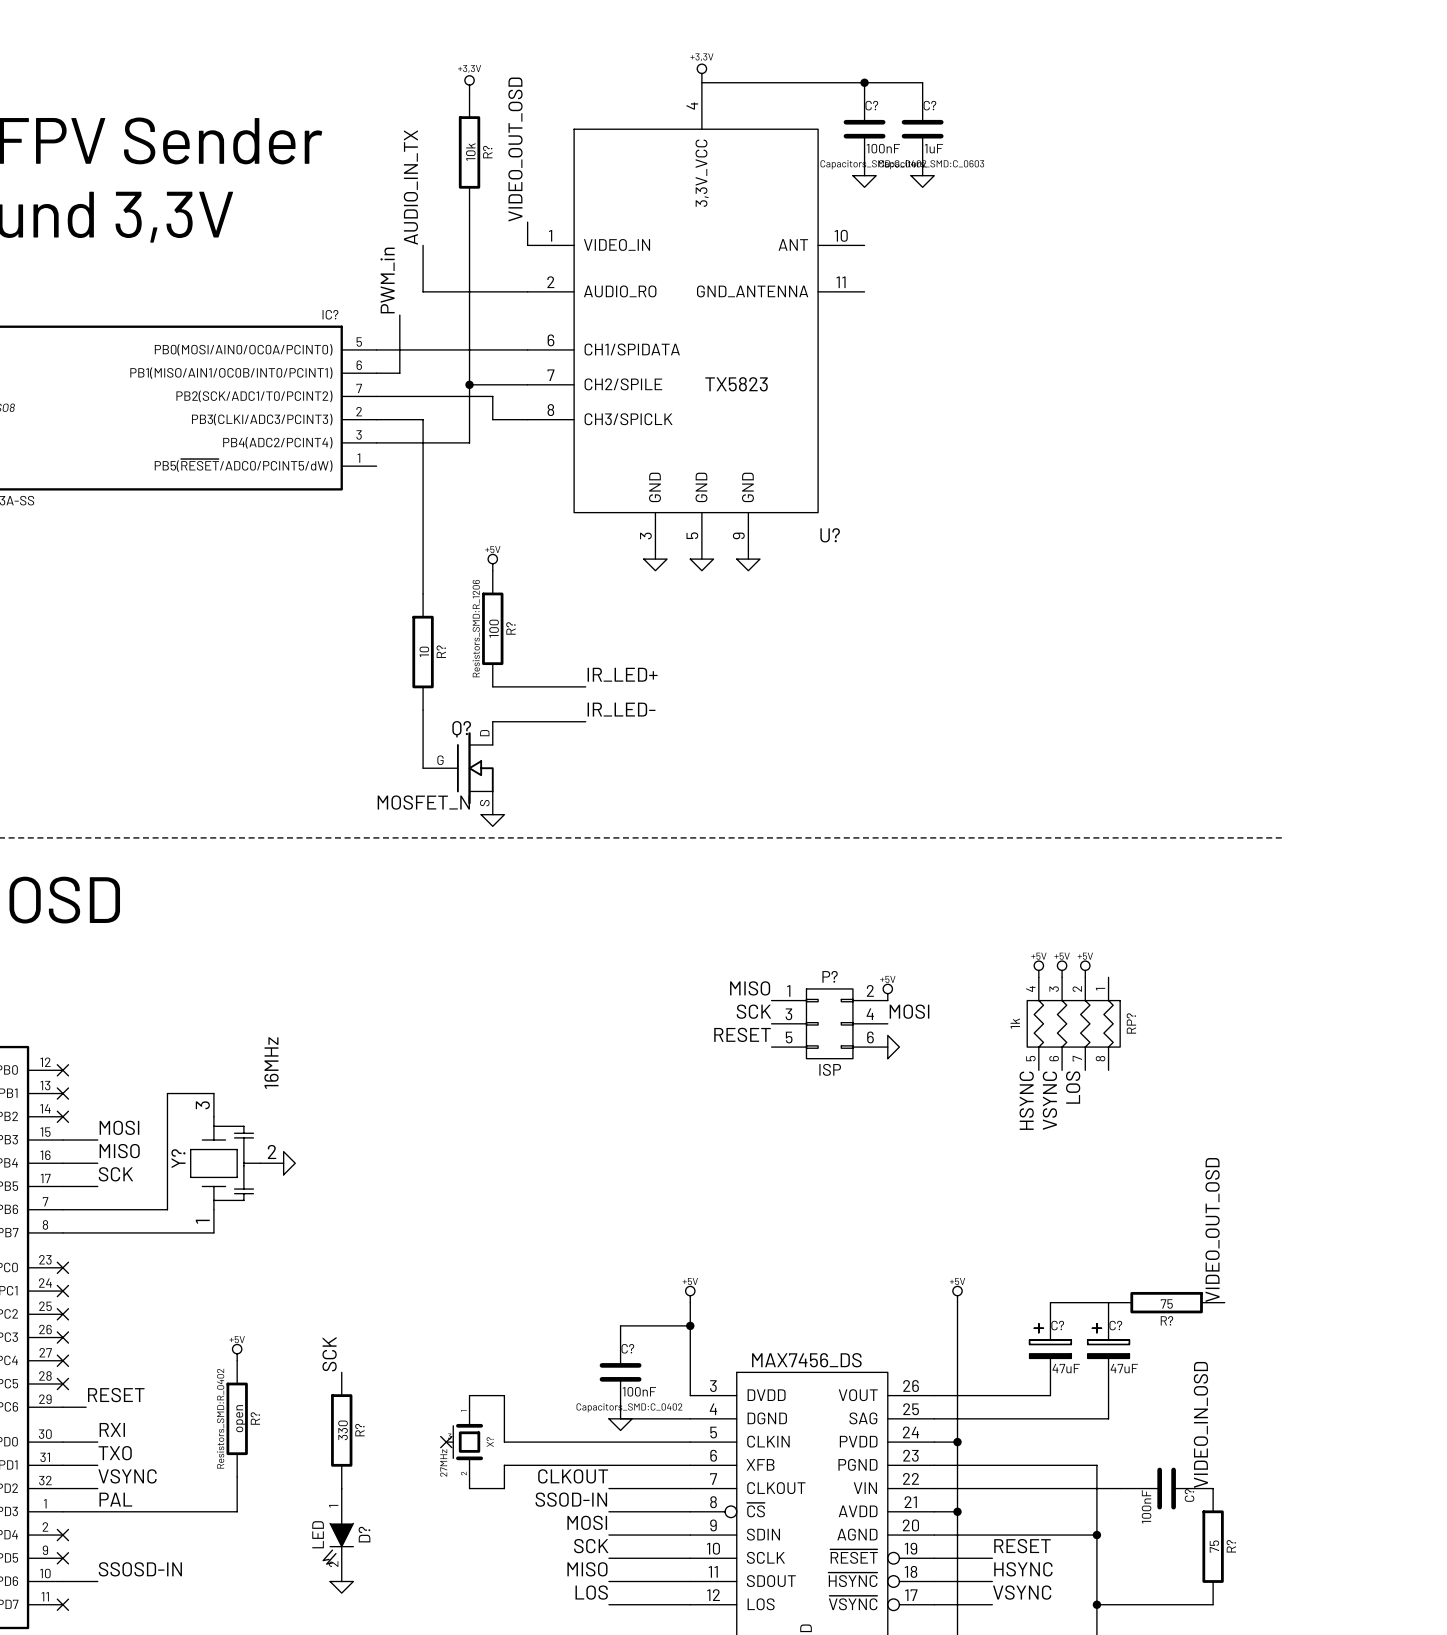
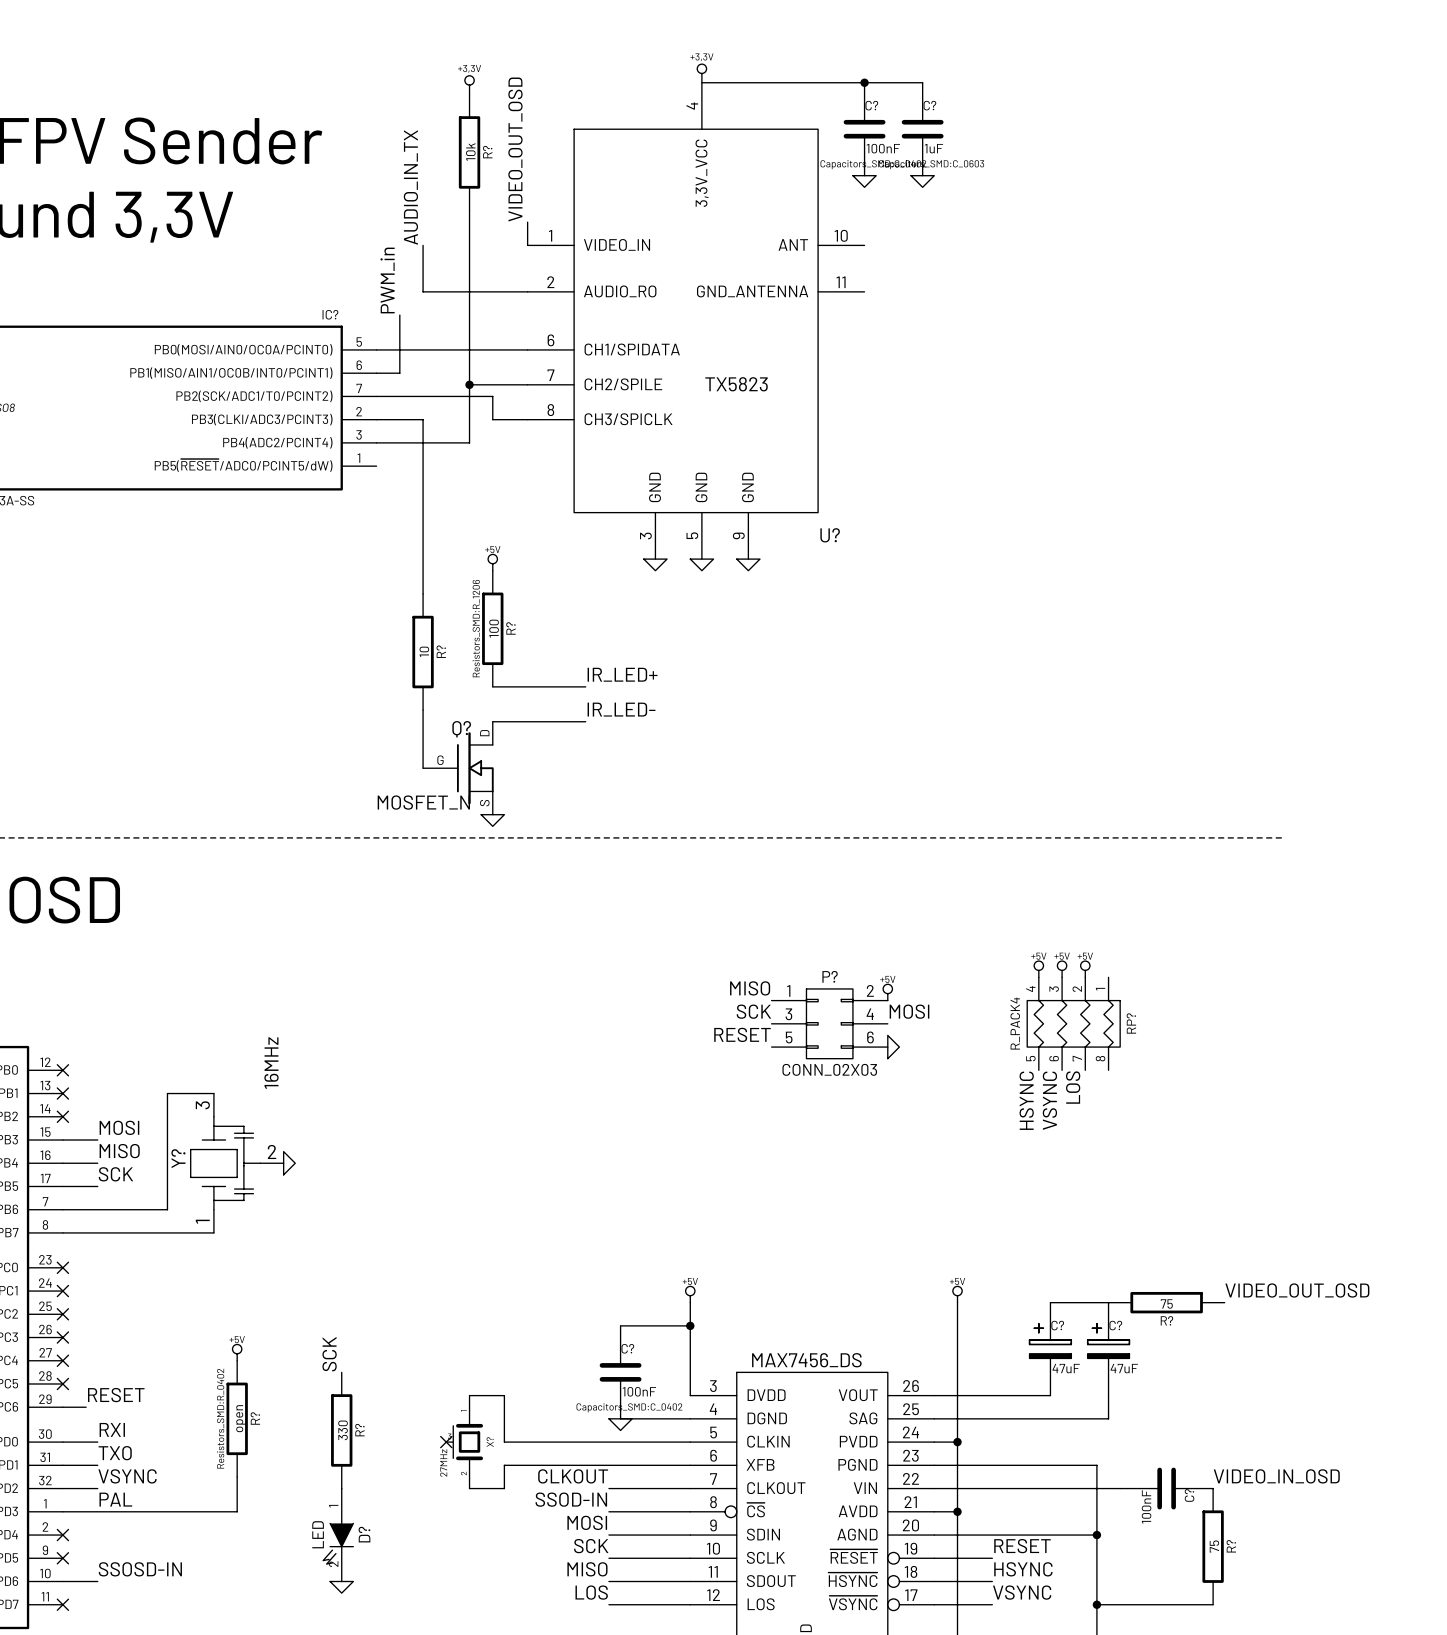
RP? value: 1k (1015, 1023) -> R_PACK4 (1015, 1023)
P? value: ISP (830, 1069) -> CONN_02X03 (829, 1069)
label rotation: 0° (1212, 1229) -> 90° clockwise (1297, 1290)
label rotation: 0° (1200, 1424) -> 90° clockwise (1276, 1476)

